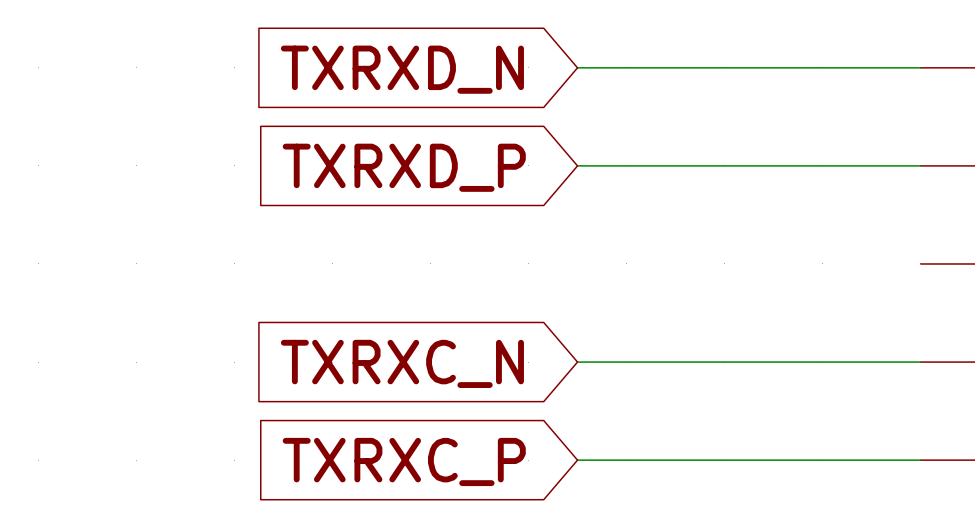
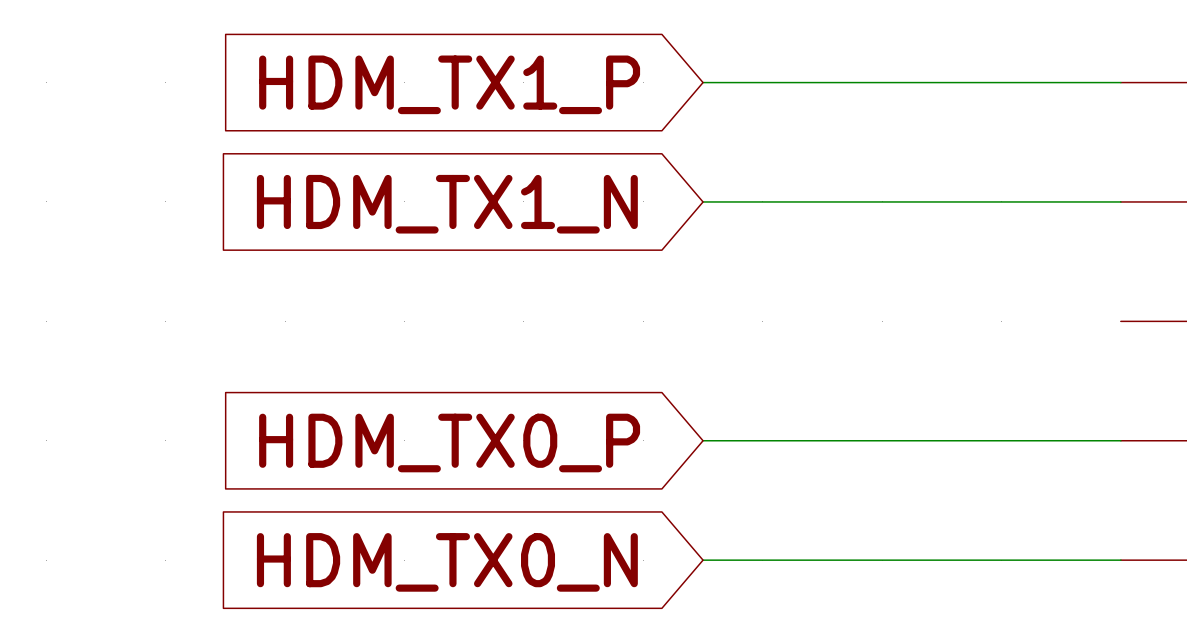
global label: TXRXD_N (402, 69) -> HDM_TX1_P (449, 84)
global label: TXRXD_P (404, 167) -> HDM_TX1_N (447, 204)
global label: TXRXC_N (402, 363) -> HDM_TX0_P (449, 443)
global label: TXRXC_P (404, 461) -> HDM_TX0_N (447, 562)

